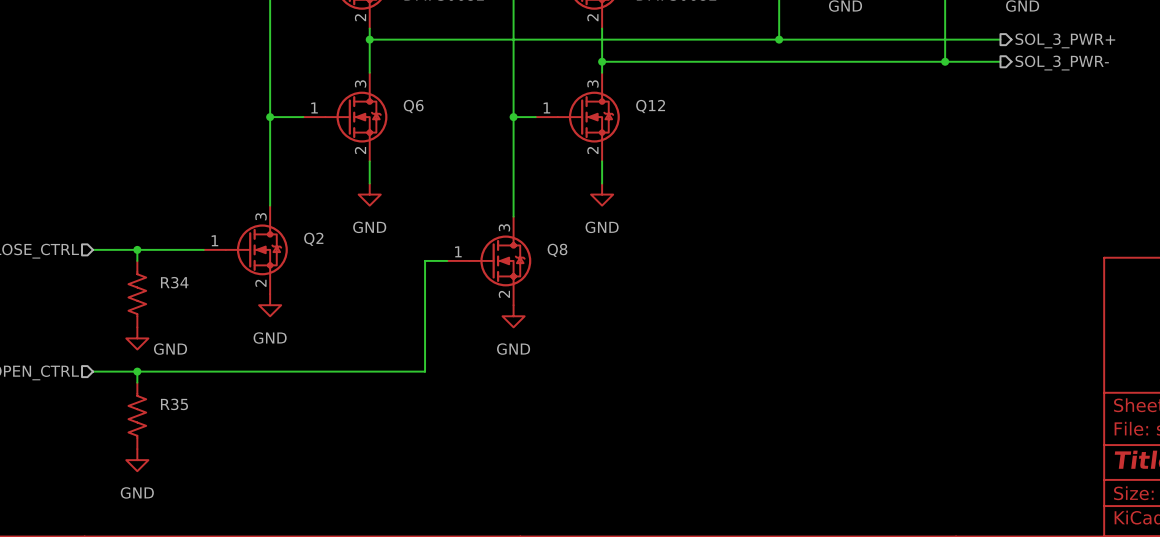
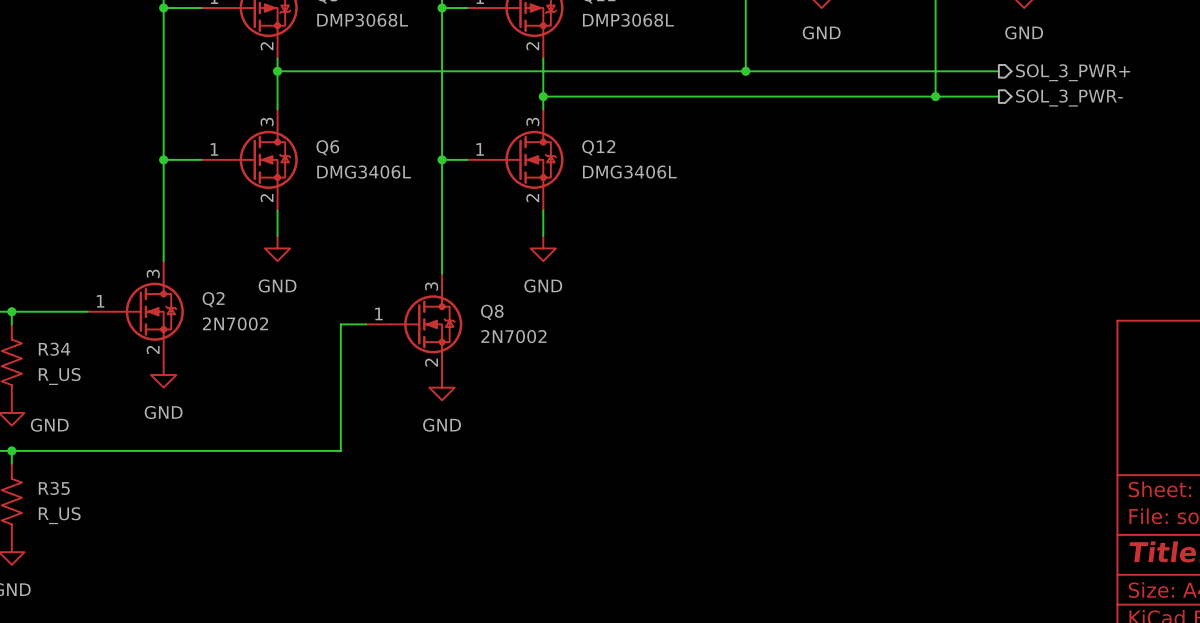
Q6 value: none -> DMG3406L (364, 172)
Q12 value: none -> DMG3406L (629, 172)
Q2 value: none -> 2N7002 (235, 323)
Q8 value: none -> 2N7002 (513, 336)
R34 value: none -> R_US (59, 376)
R35 value: none -> R_US (59, 515)

